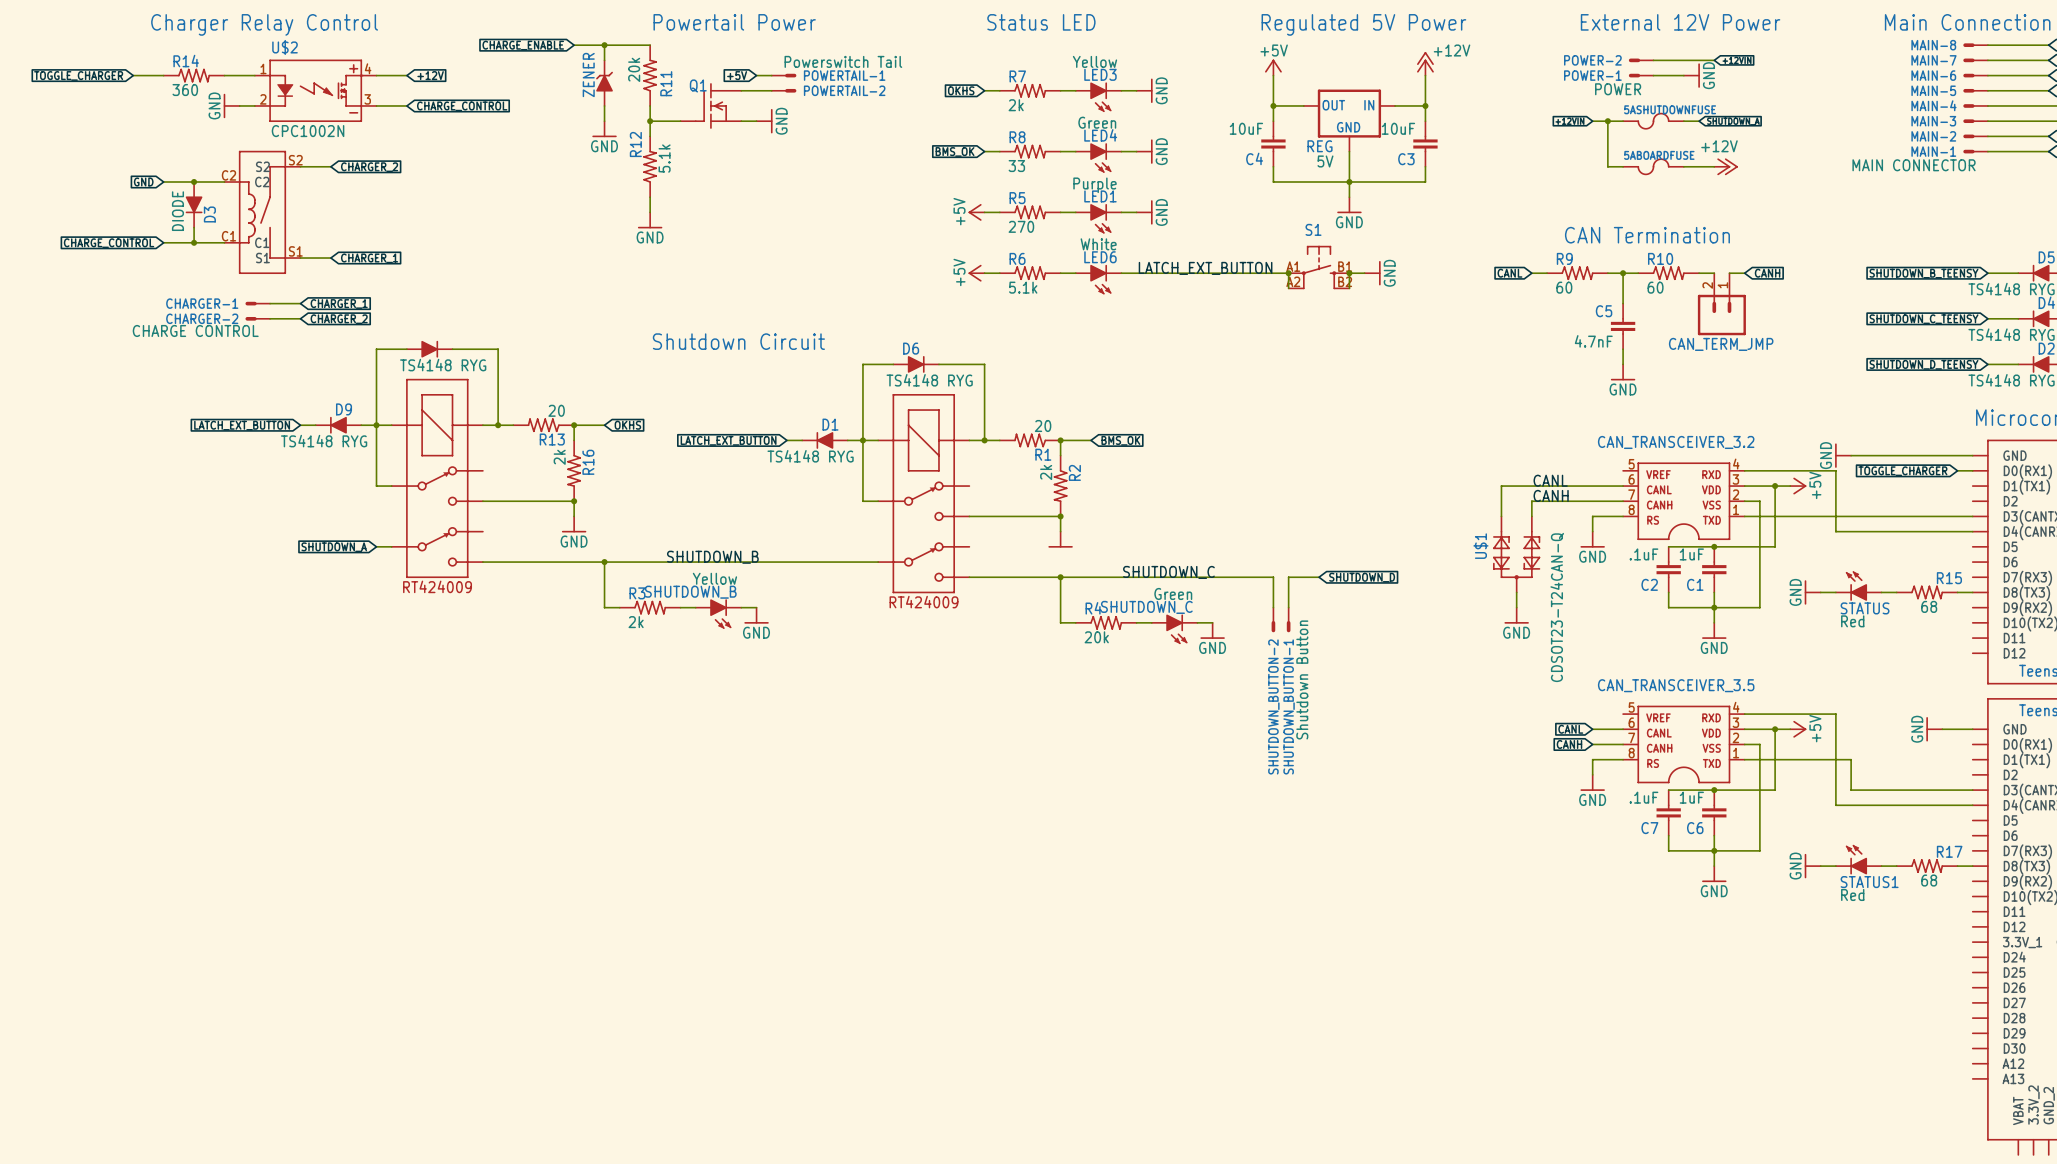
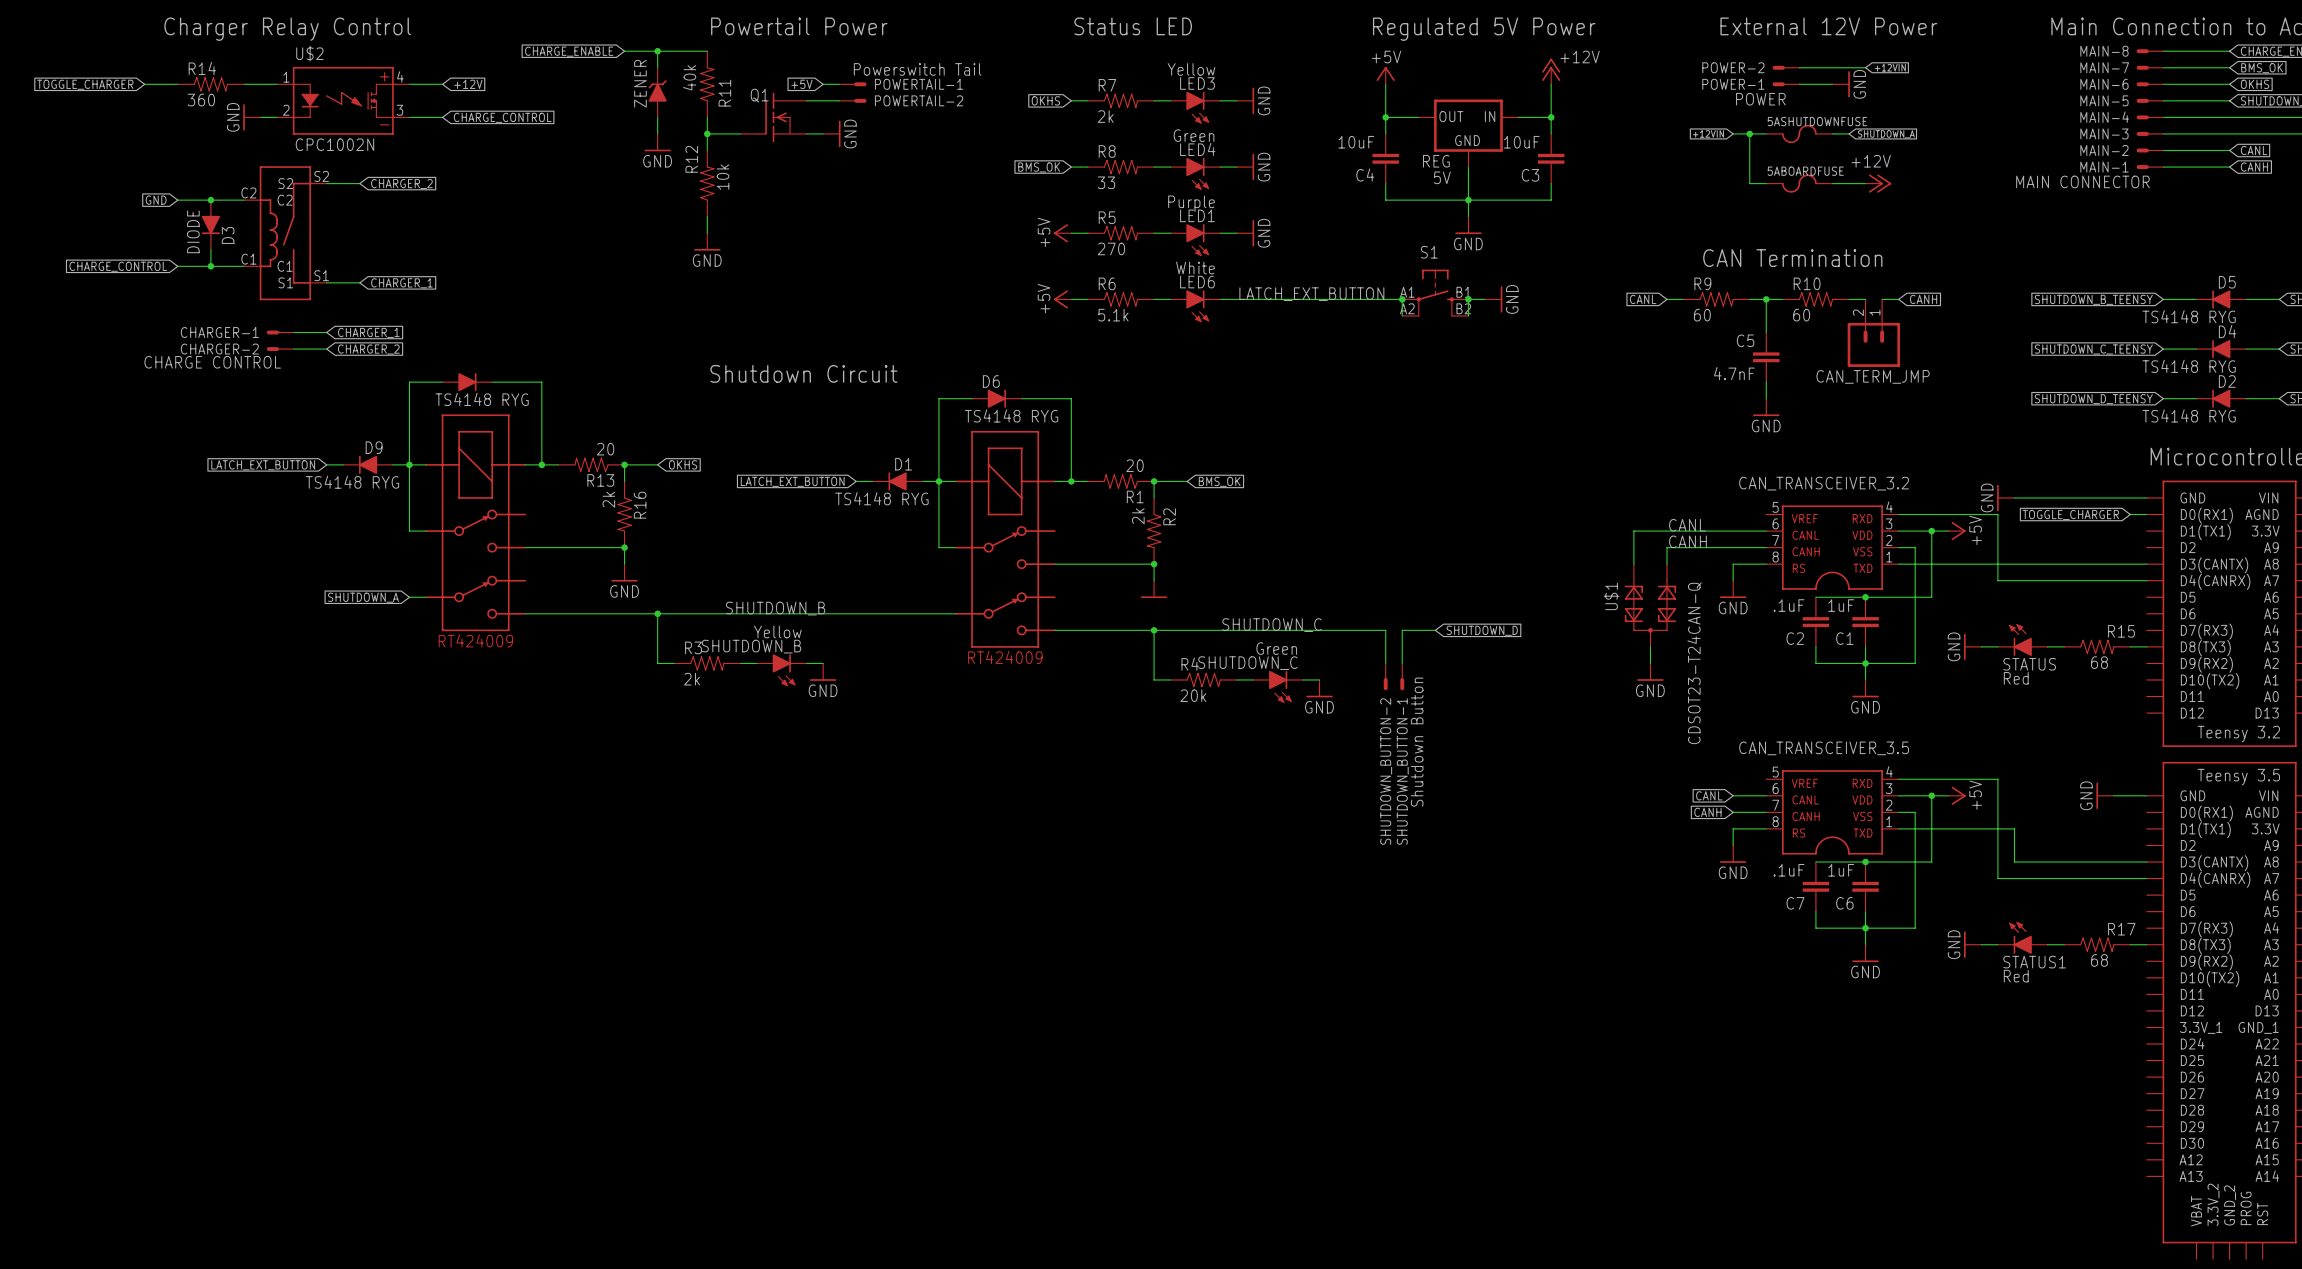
R11 value: 20k (634, 69) -> 40k (689, 77)
R12 value: 5.1k (664, 158) -> 10k (723, 177)

